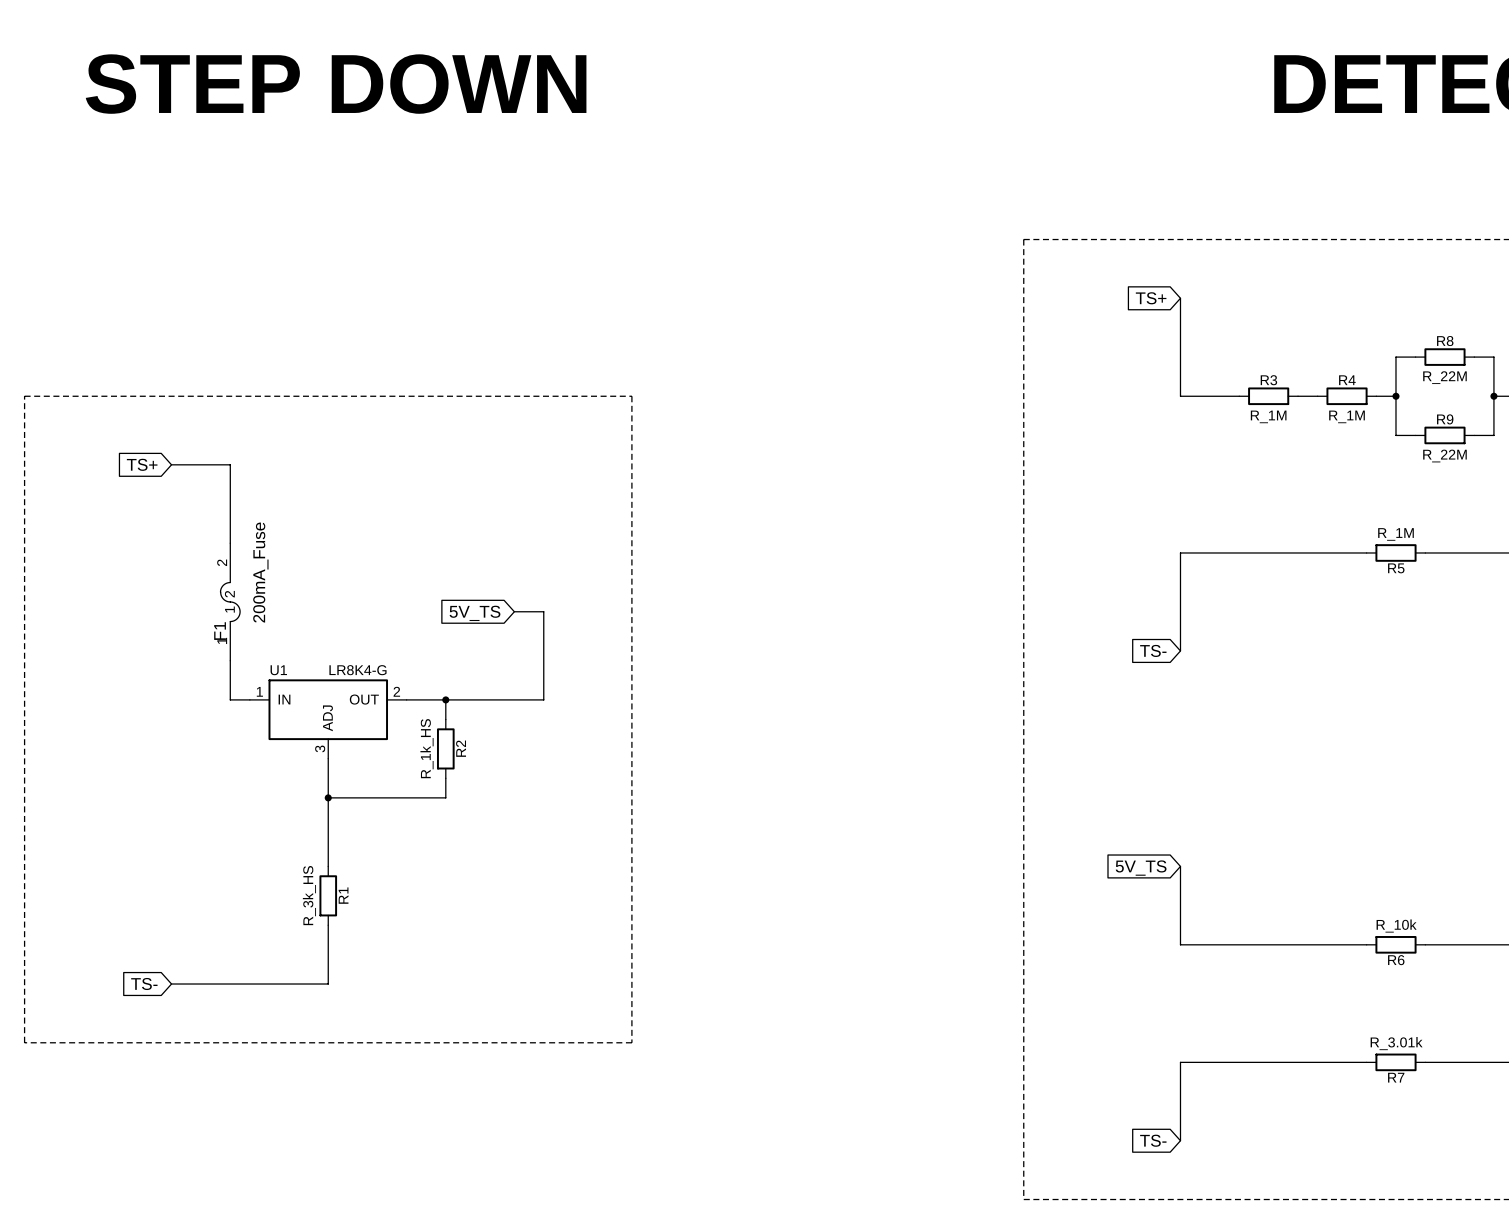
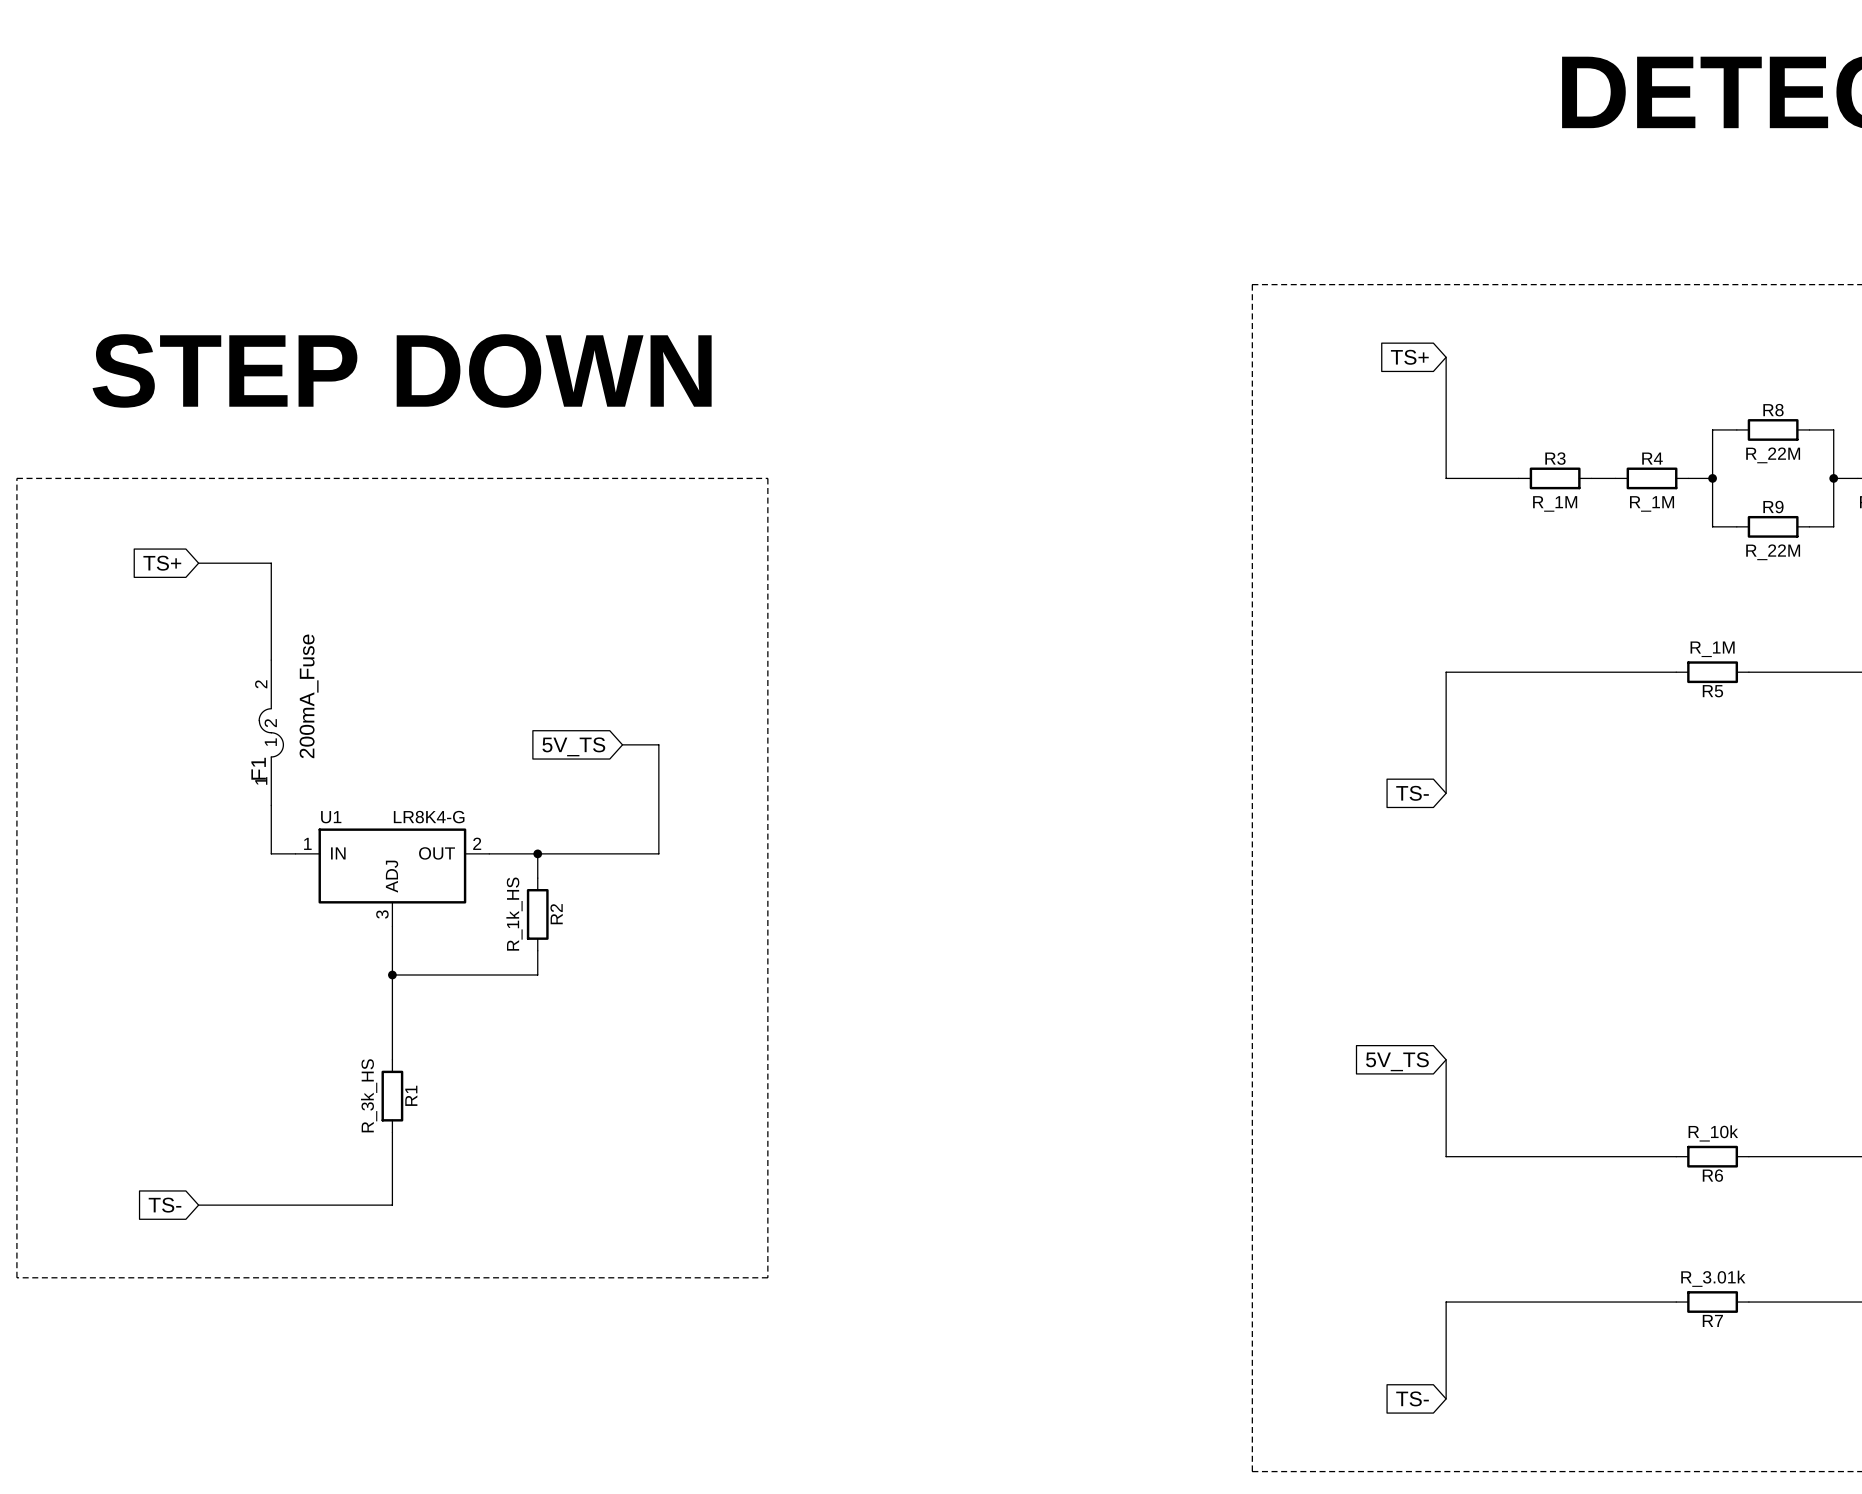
text: STEP DOWN (336, 84) -> none
text: none -> STEP DOWN (402, 370)

